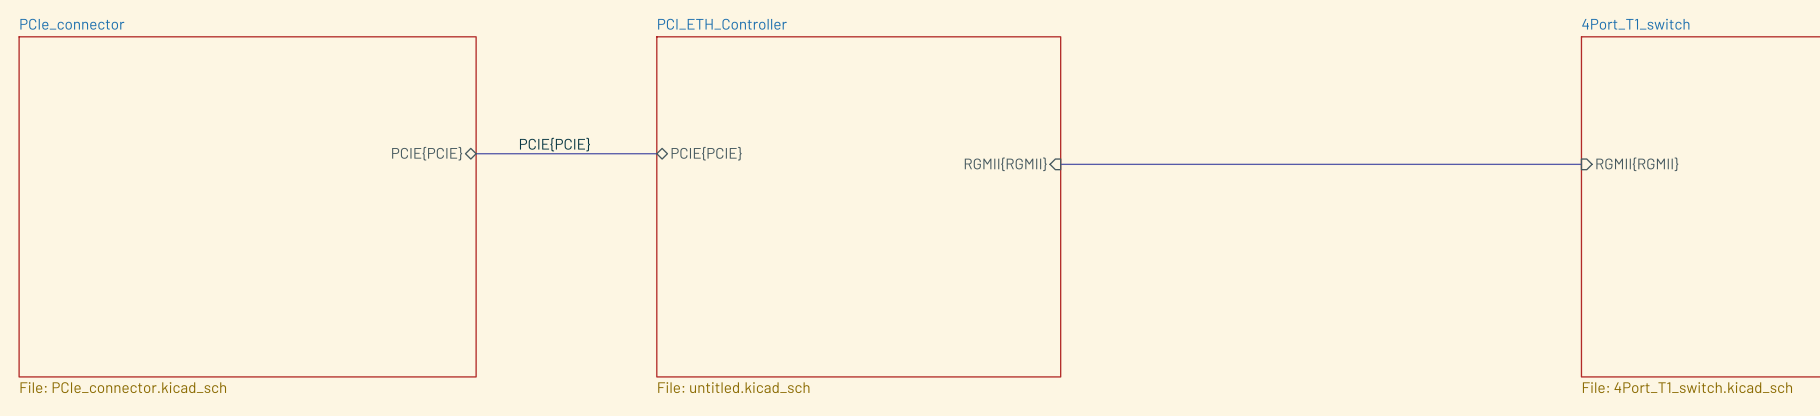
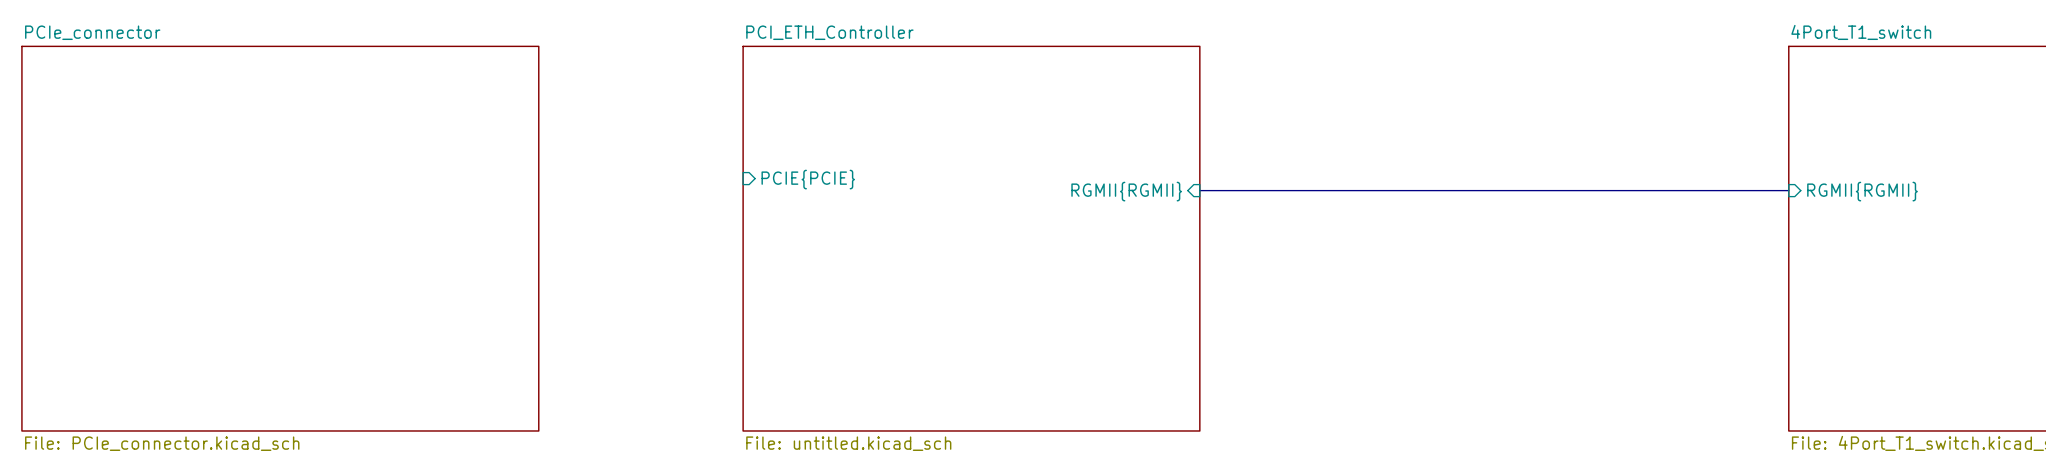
label: PCIE{PCIE} (554, 144) -> none
sheet pin: PCIE{PCIE} (427, 153) -> none
bus: (476, 153) (656, 153) -> none
sheet pin shape: bidirectional (706, 153) -> input (808, 179)

